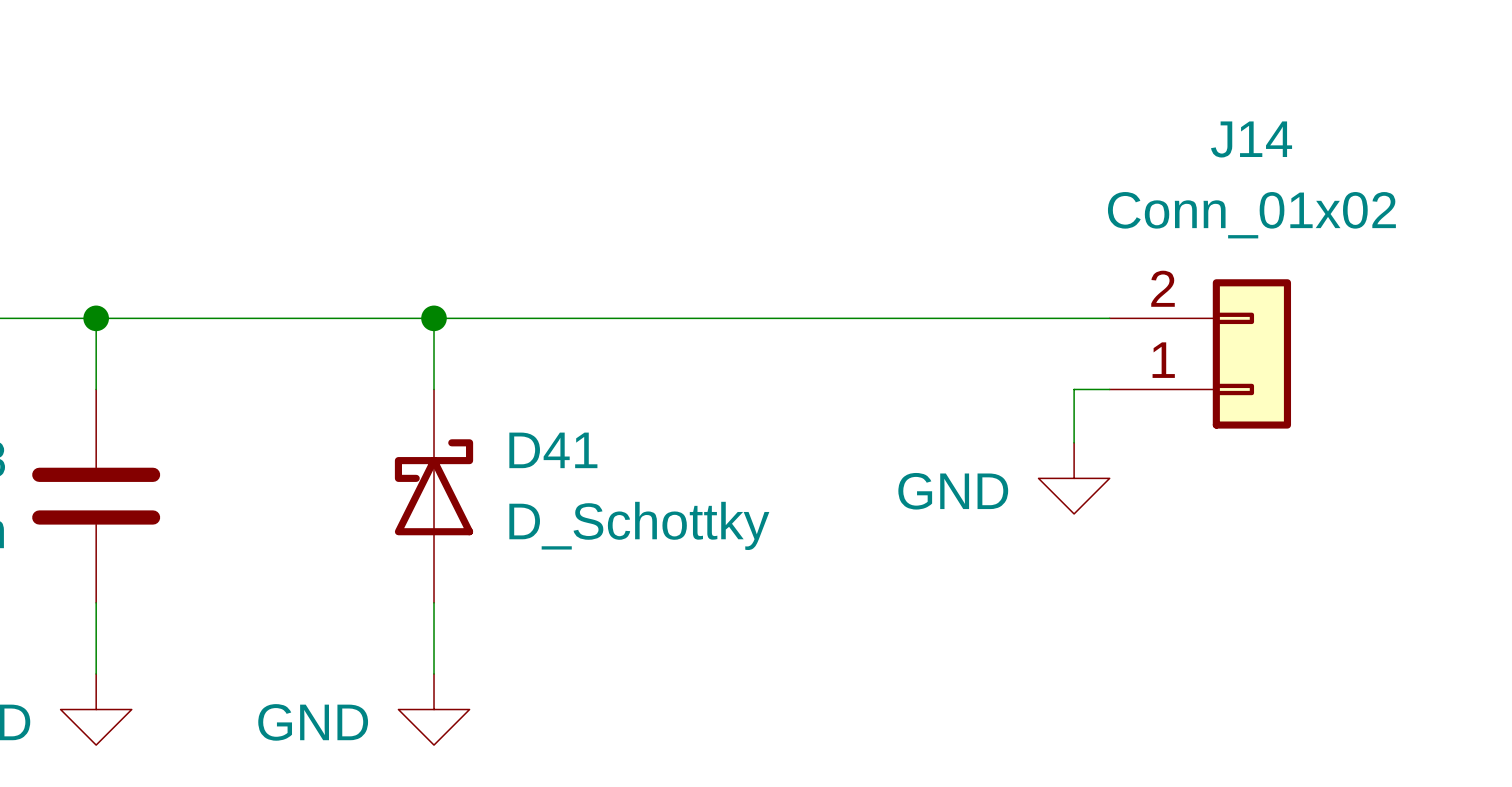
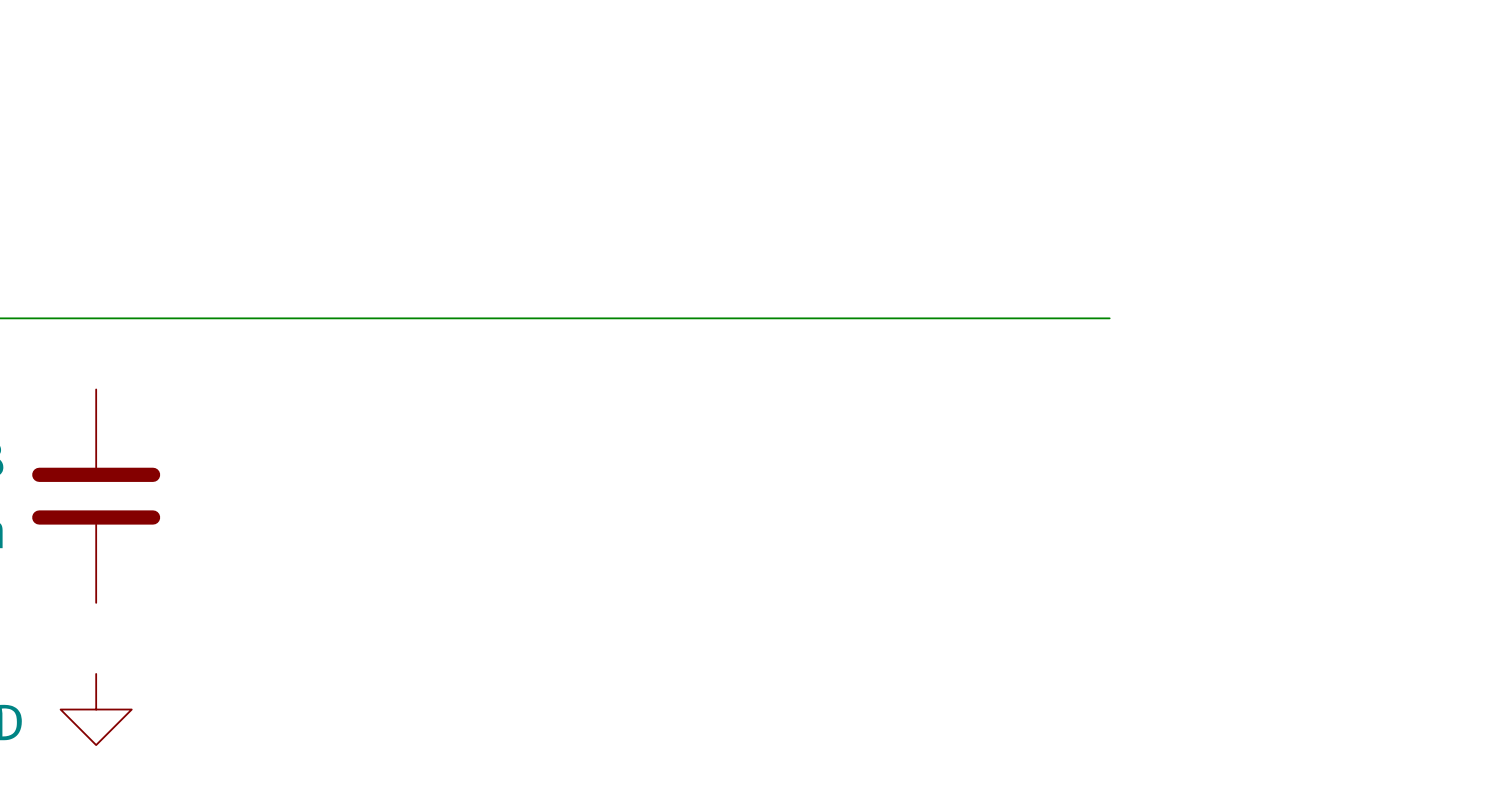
wire: (96, 318) (96, 389) -> none
junction: (96, 318) -> none
wire: (434, 318) (434, 389) -> none
junction: (434, 318) -> none
J14: Conn_01x02 (1200, 353) -> none
wire: (1109, 389) (1074, 389) (1074, 442) -> none
power symbol: GND (1074, 478) -> none
D41: D_Schottky (434, 496) -> none
wire: (96, 602) (96, 673) -> none
wire: (434, 602) (434, 673) -> none
power symbol: GND (434, 709) -> none

